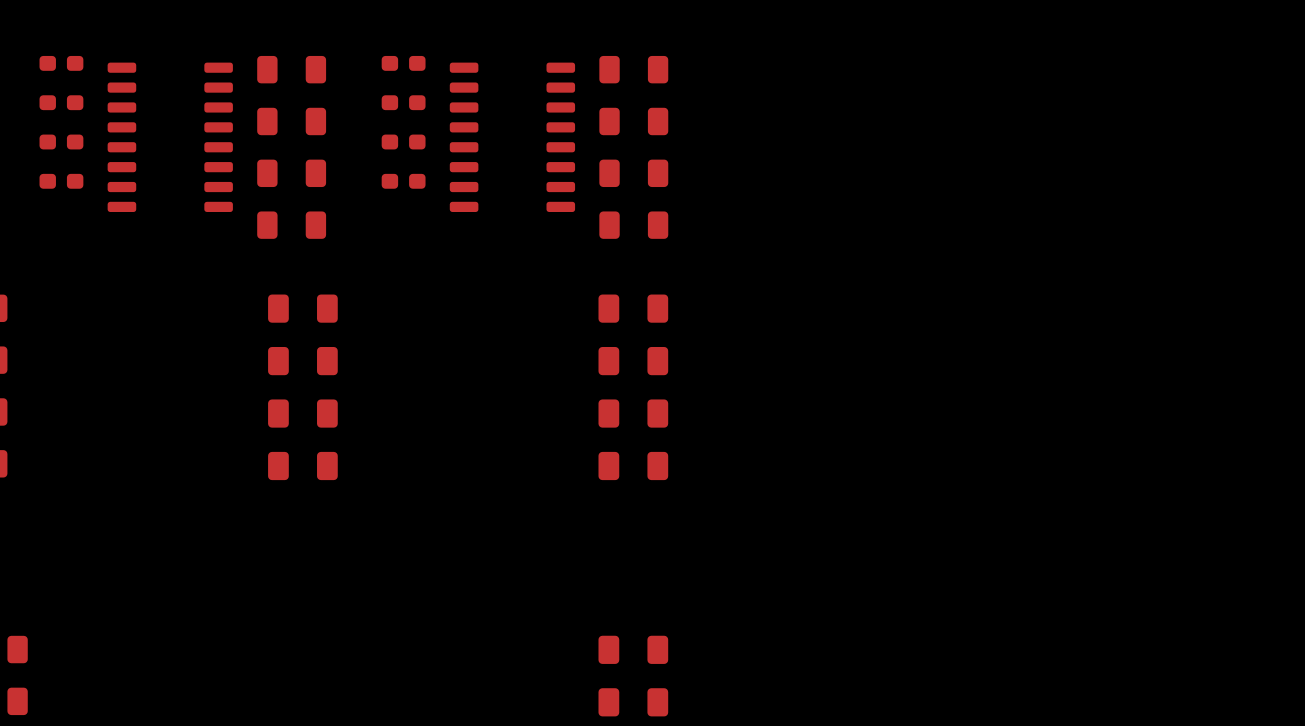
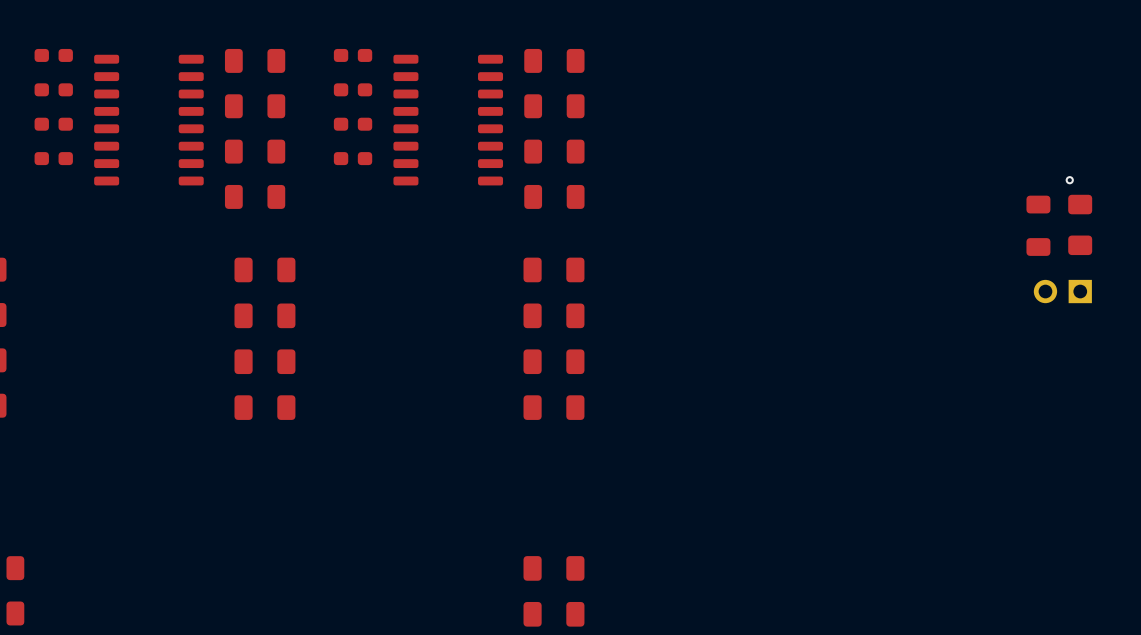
via: none -> (1069, 180)
part: none -> (1080, 224)
part: none -> (1038, 225)
part: none -> (1062, 291)

